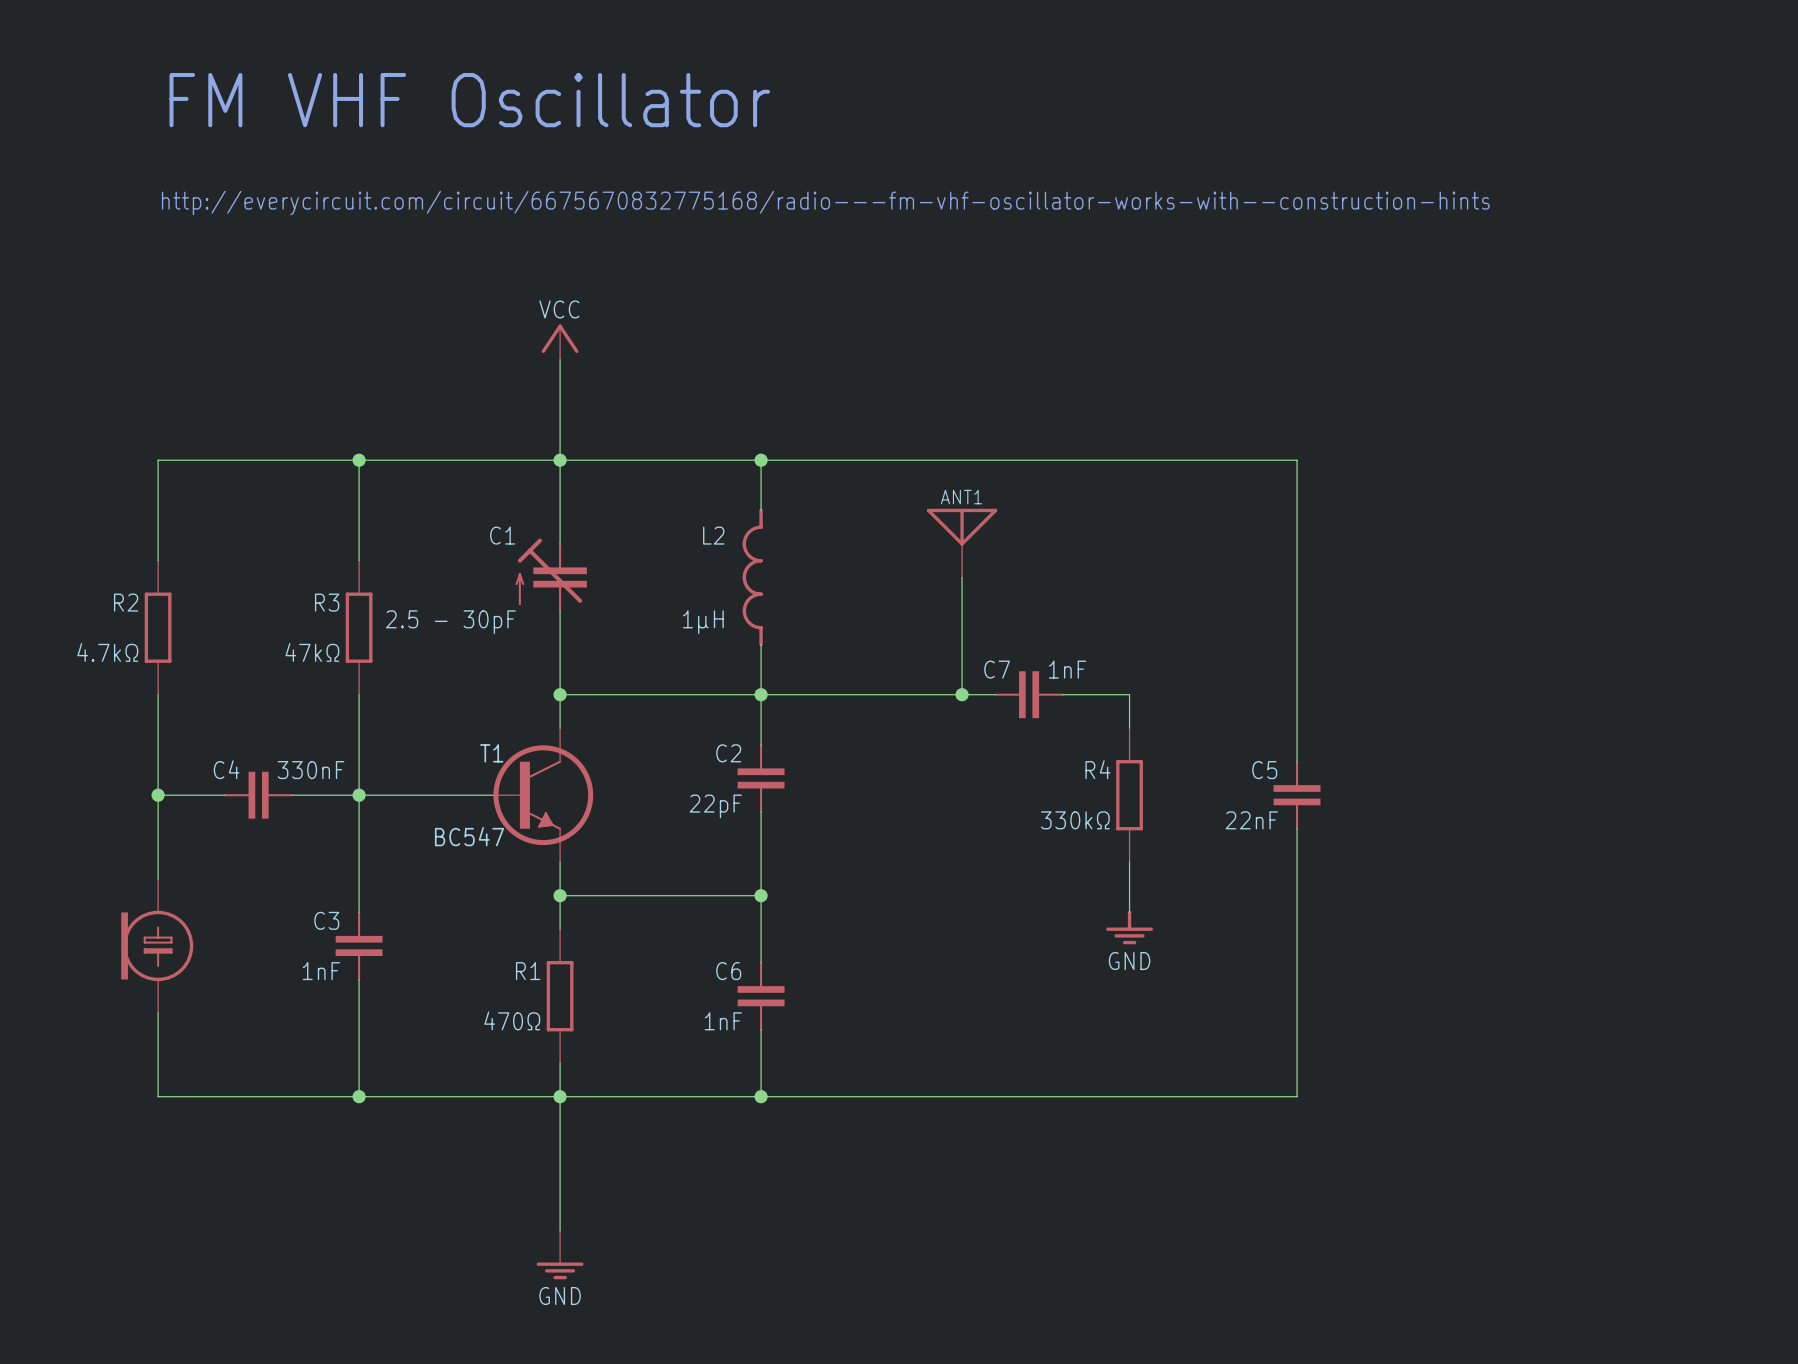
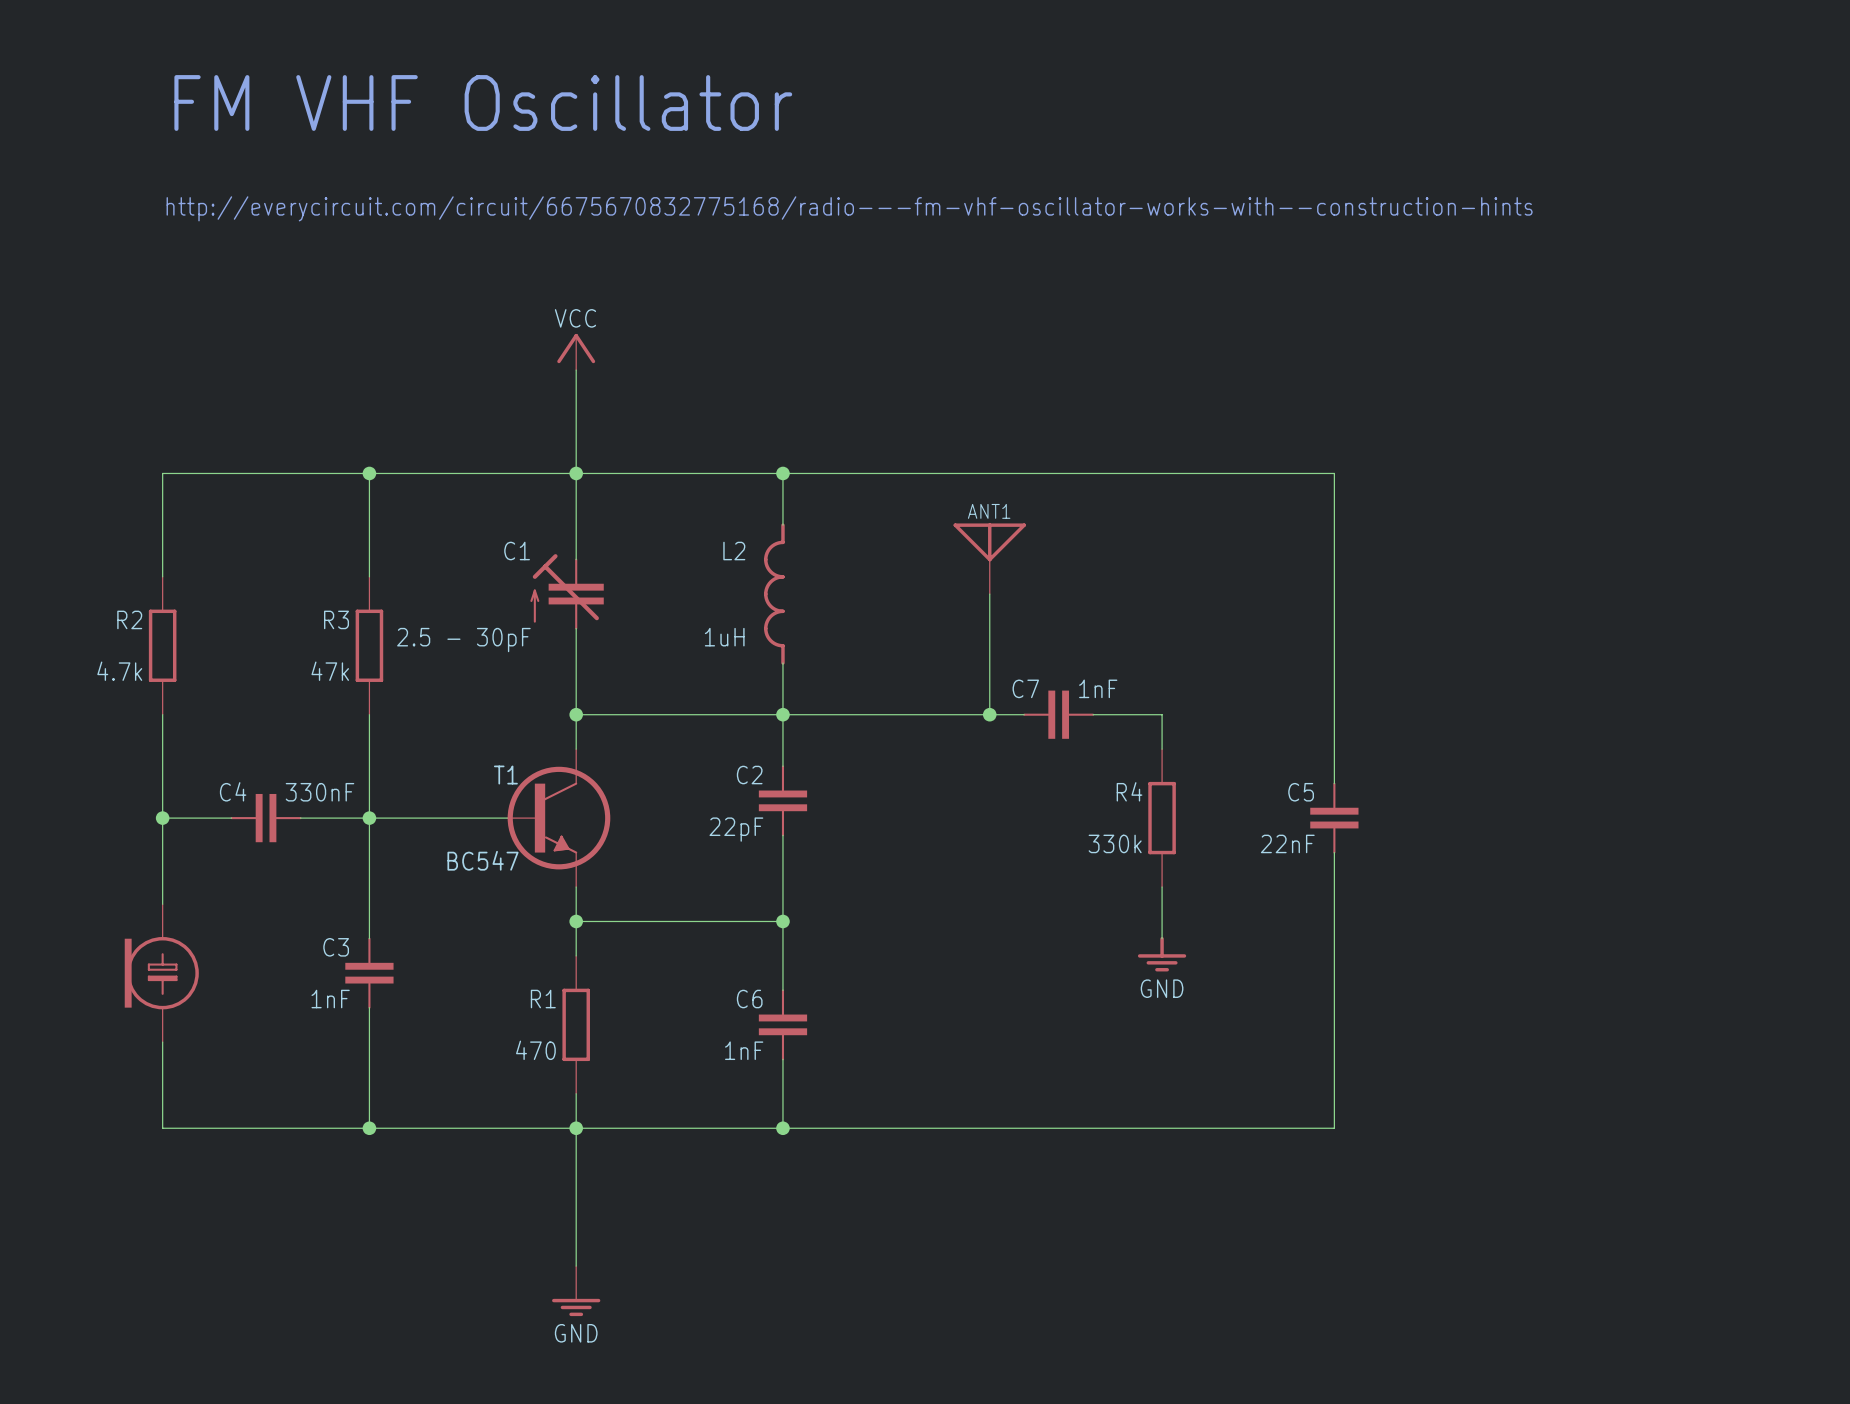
L2 value: 1μH (703, 622) -> 1uH (724, 637)
R2 value: 4.7kΩ (107, 652) -> 4.7k (119, 671)
R3 value: 47kΩ (312, 652) -> 47k (330, 671)
R4 value: 330kΩ (1075, 820) -> 330k (1115, 843)
R1 value: 470Ω (512, 1020) -> 470 (535, 1050)

